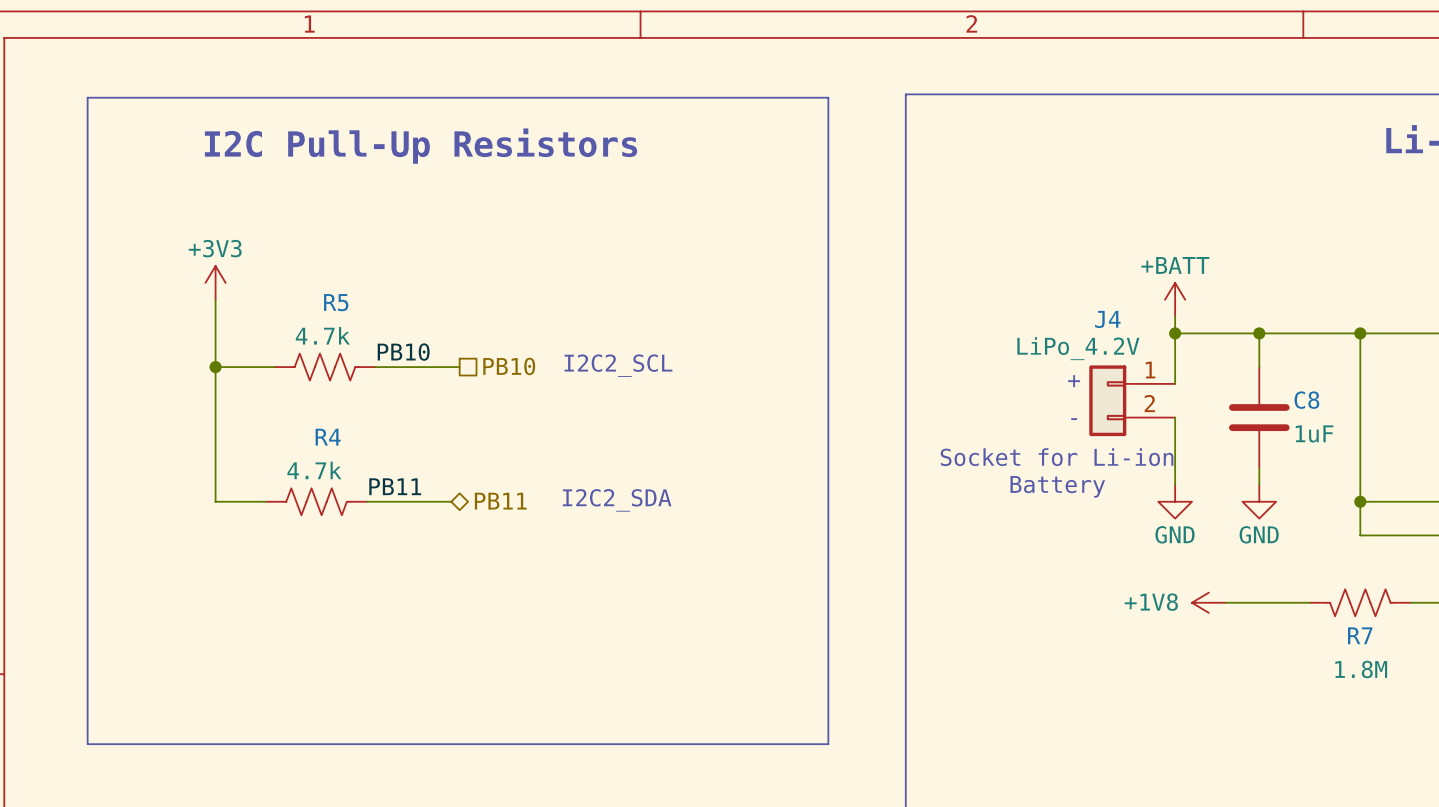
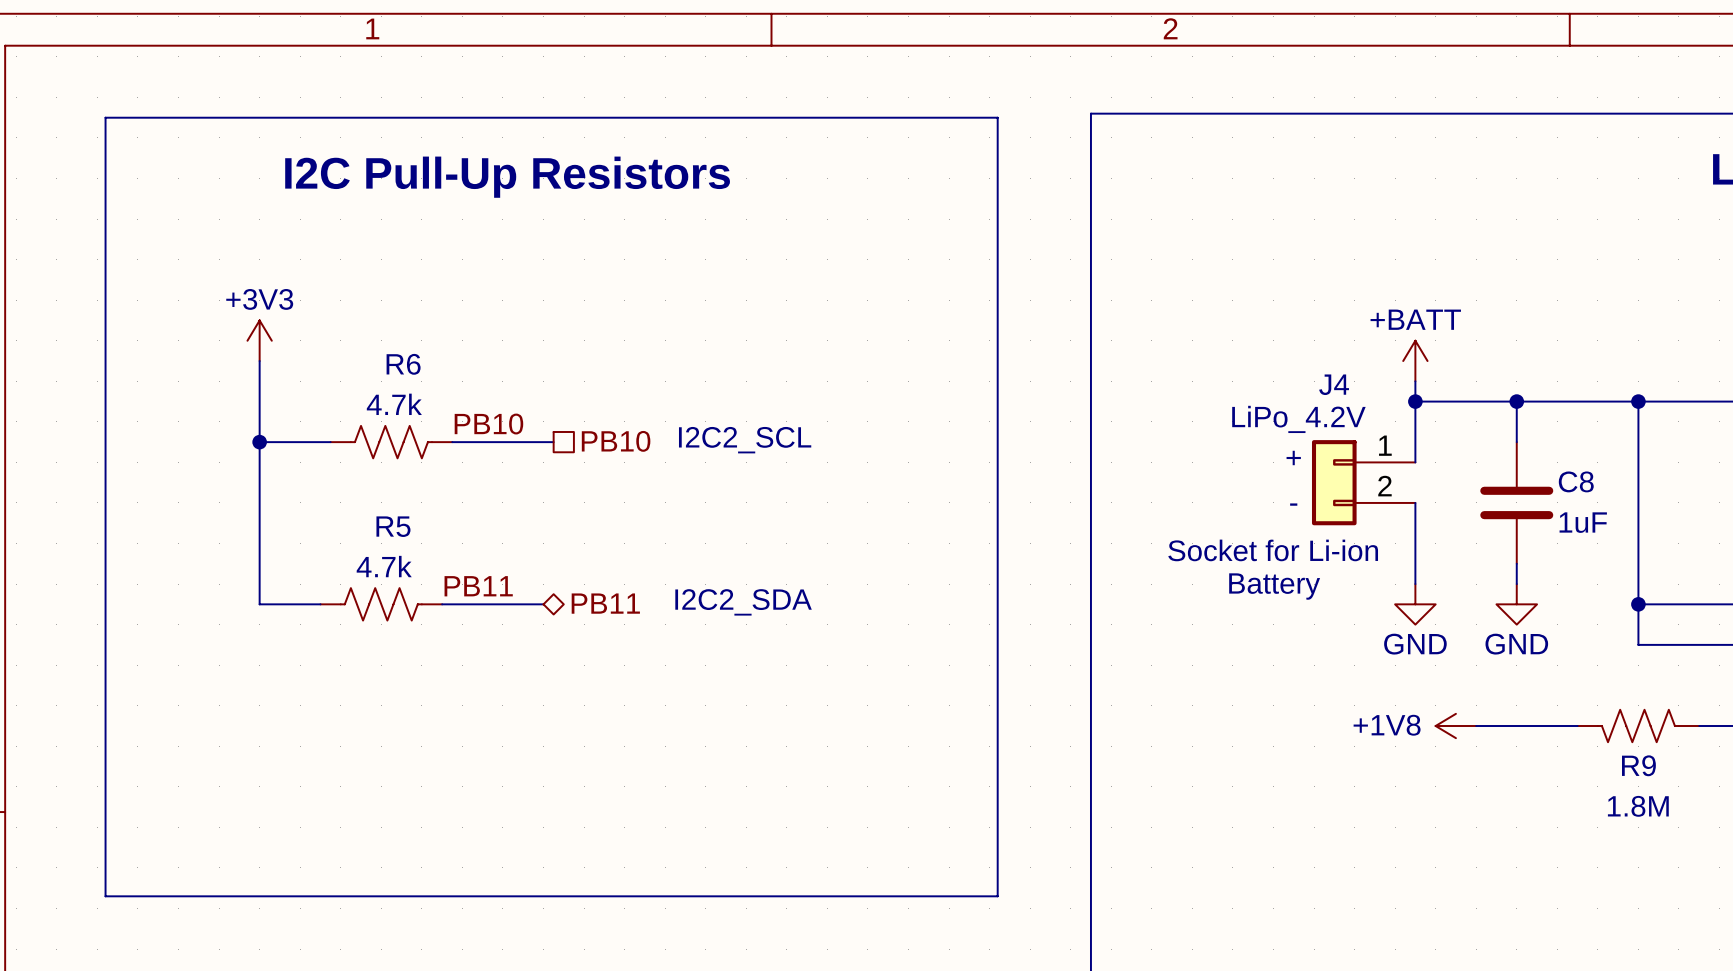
R5 name: R5 (336, 302) -> R6 (403, 364)
R4 name: R4 (328, 437) -> R5 (393, 526)
R7 name: R7 (1360, 635) -> R9 (1638, 765)

